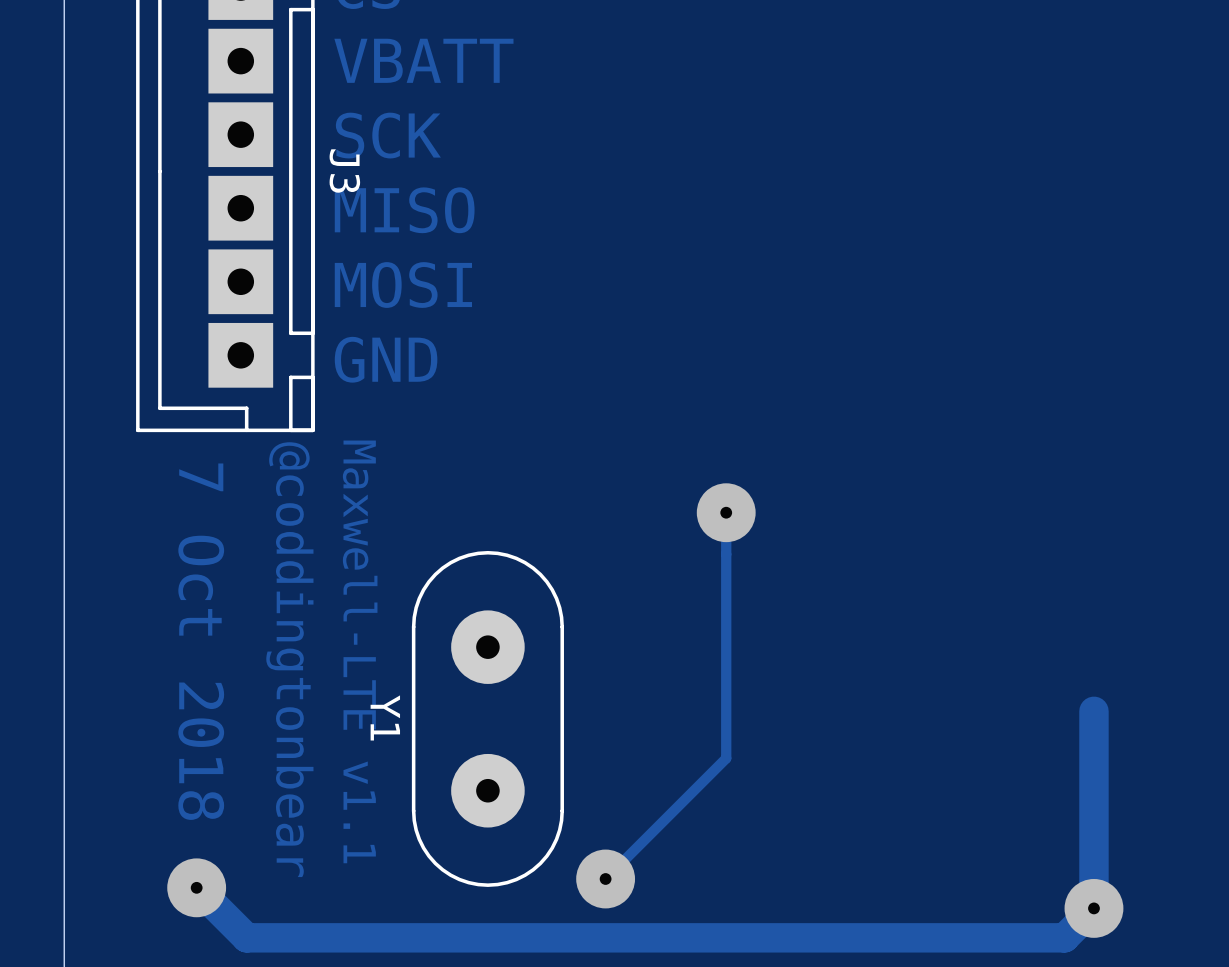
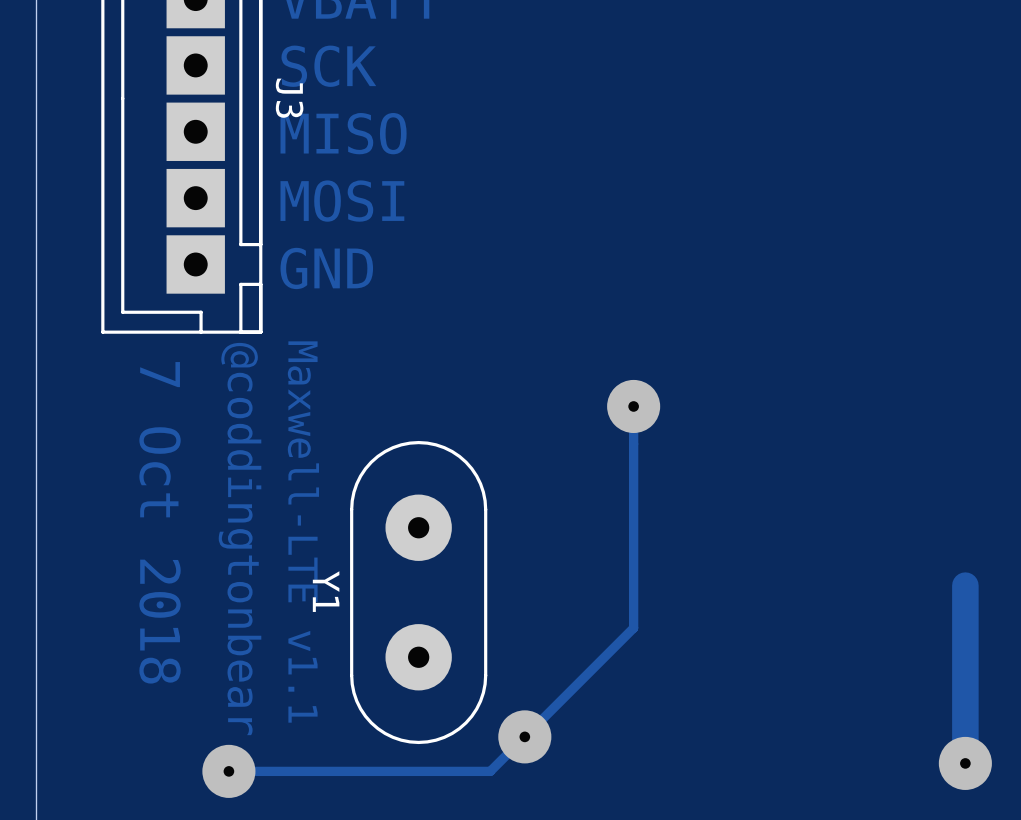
track: none -> (524, 736) (490, 771) (228, 771)
track: (196, 887) (246, 937) (1064, 937) (1093, 908) -> none
via position: (196, 887) -> (228, 771)

